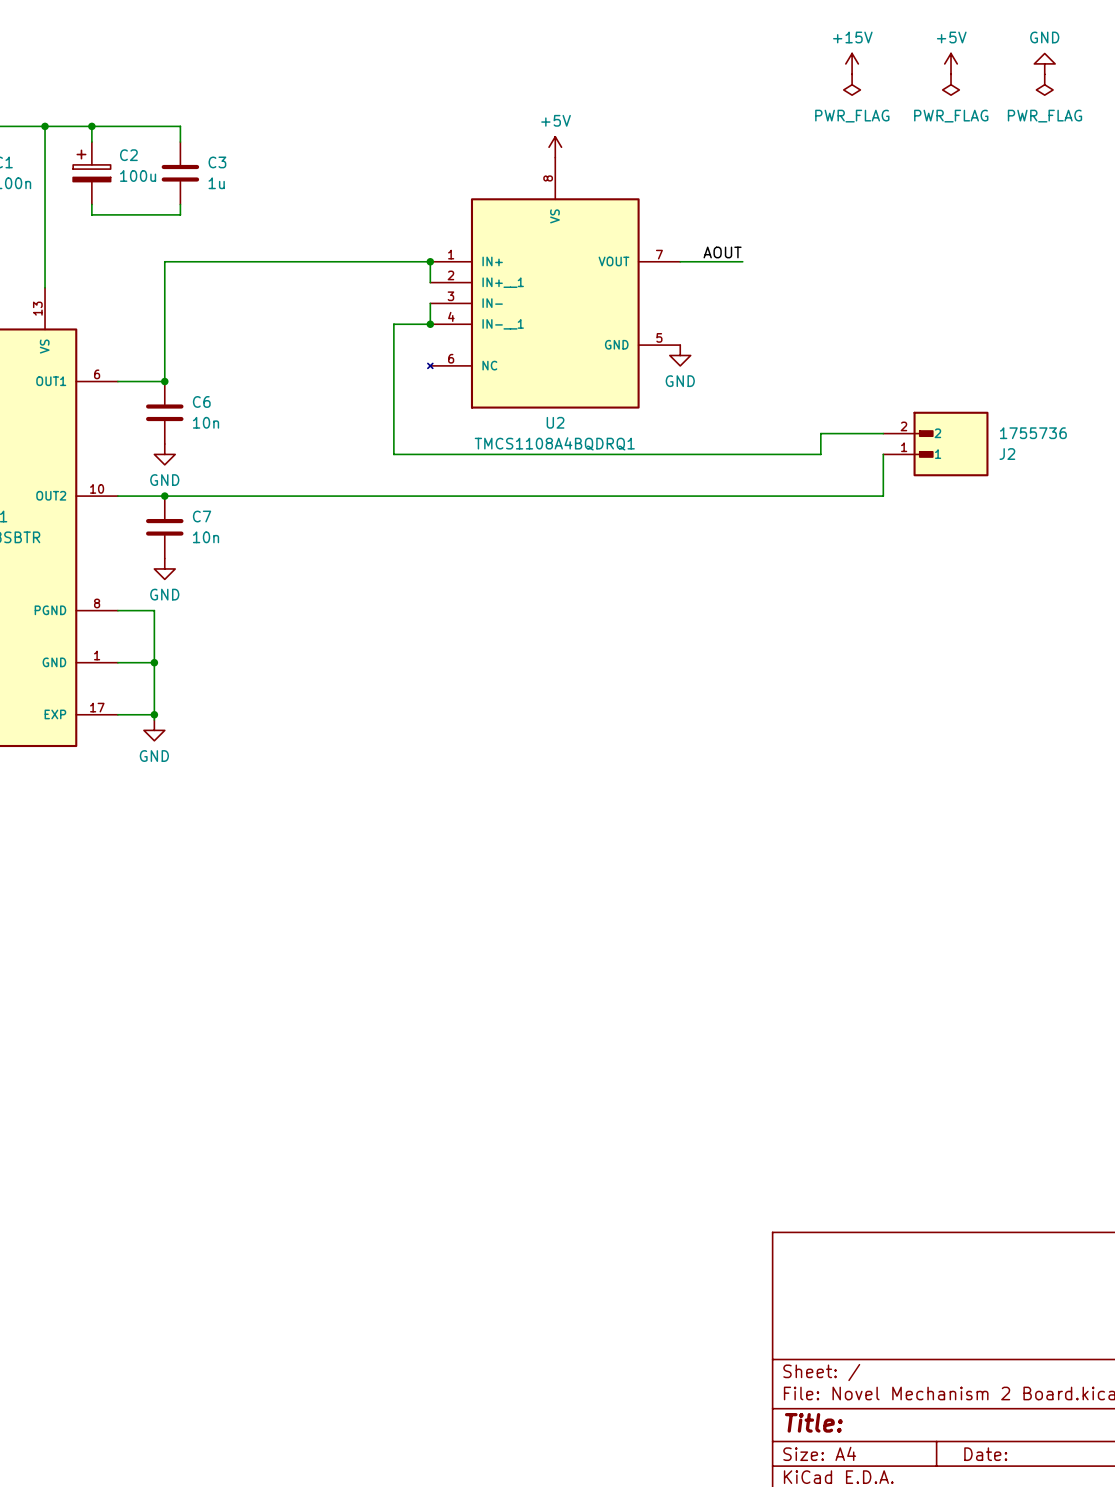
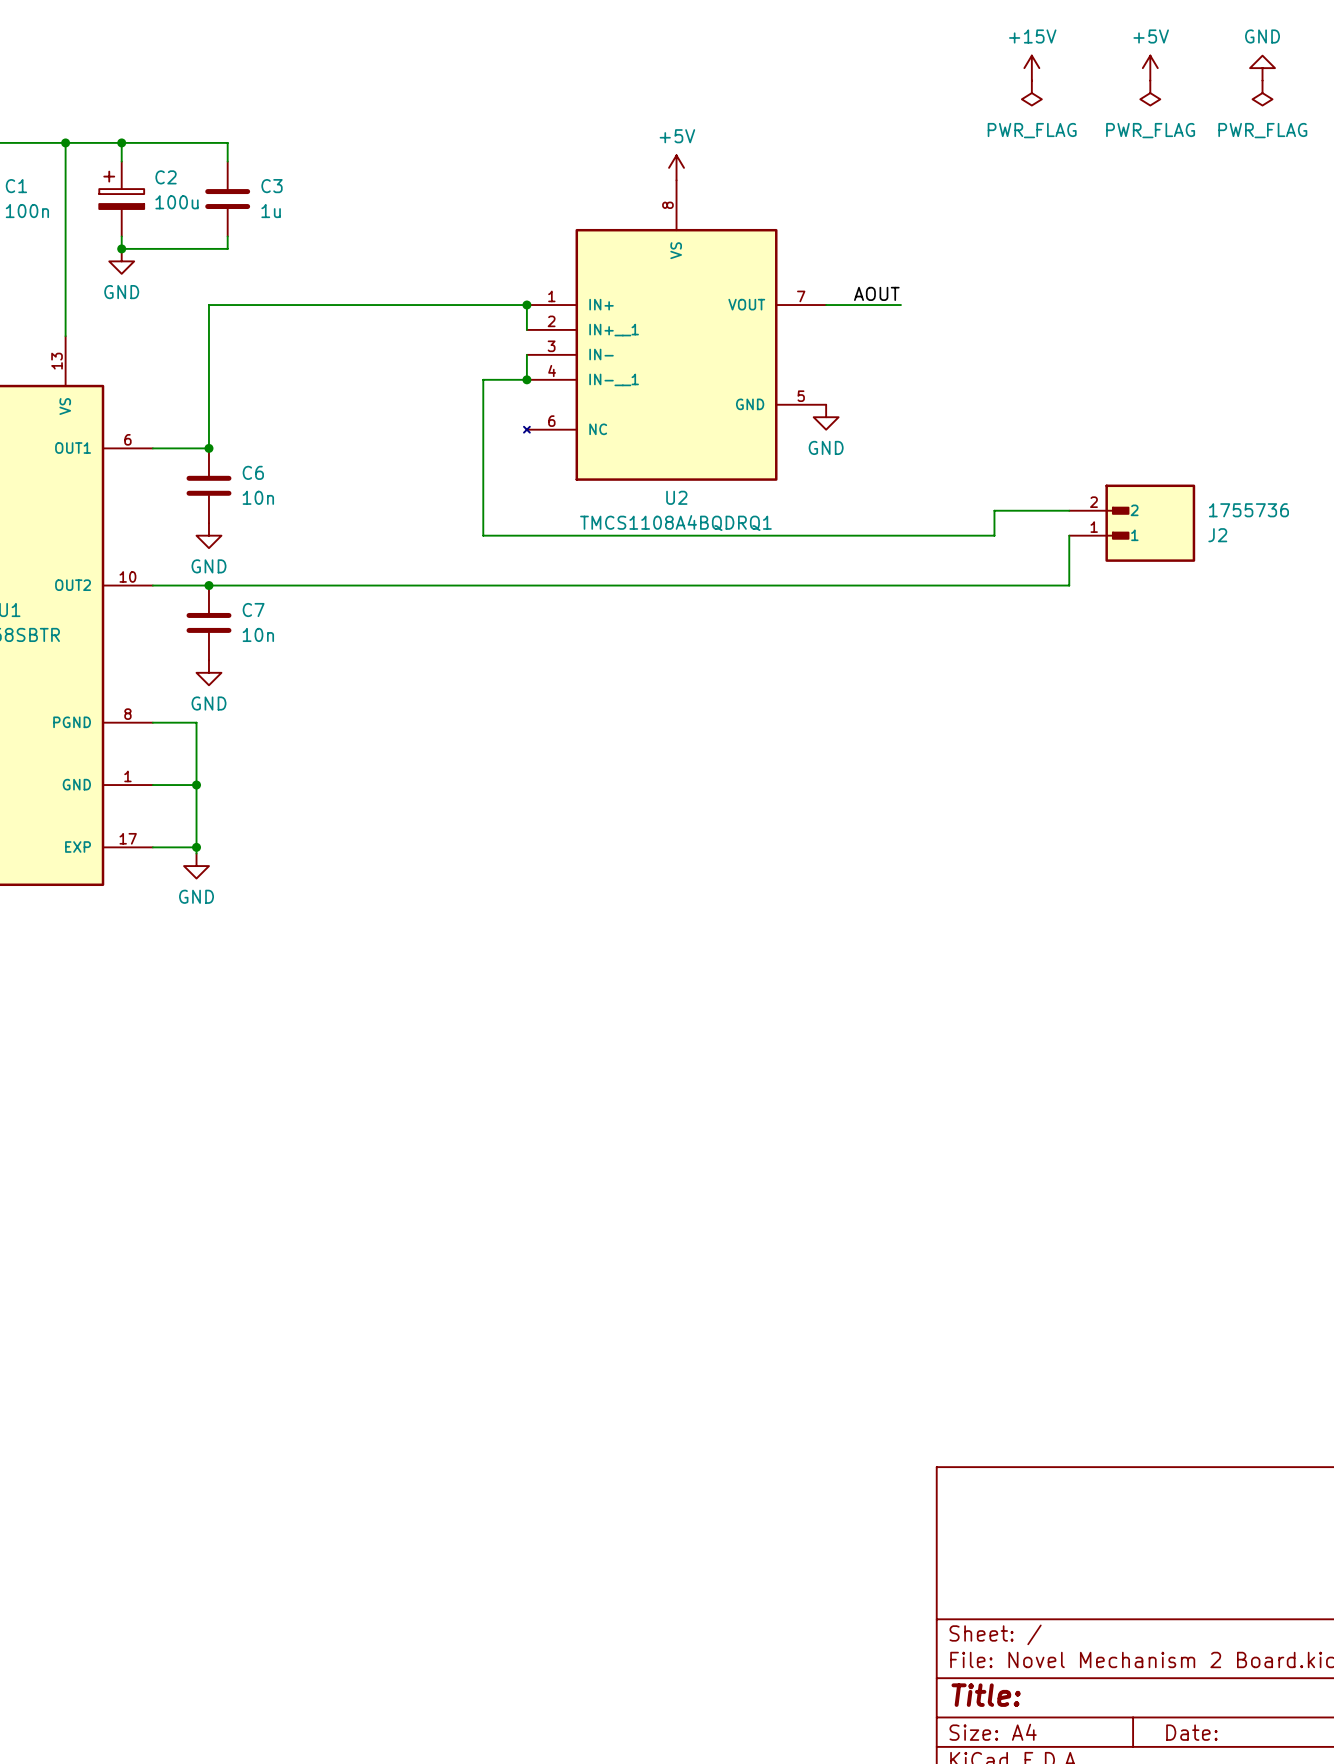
junction: none -> (121, 248)
power symbol: none -> GND (121, 261)

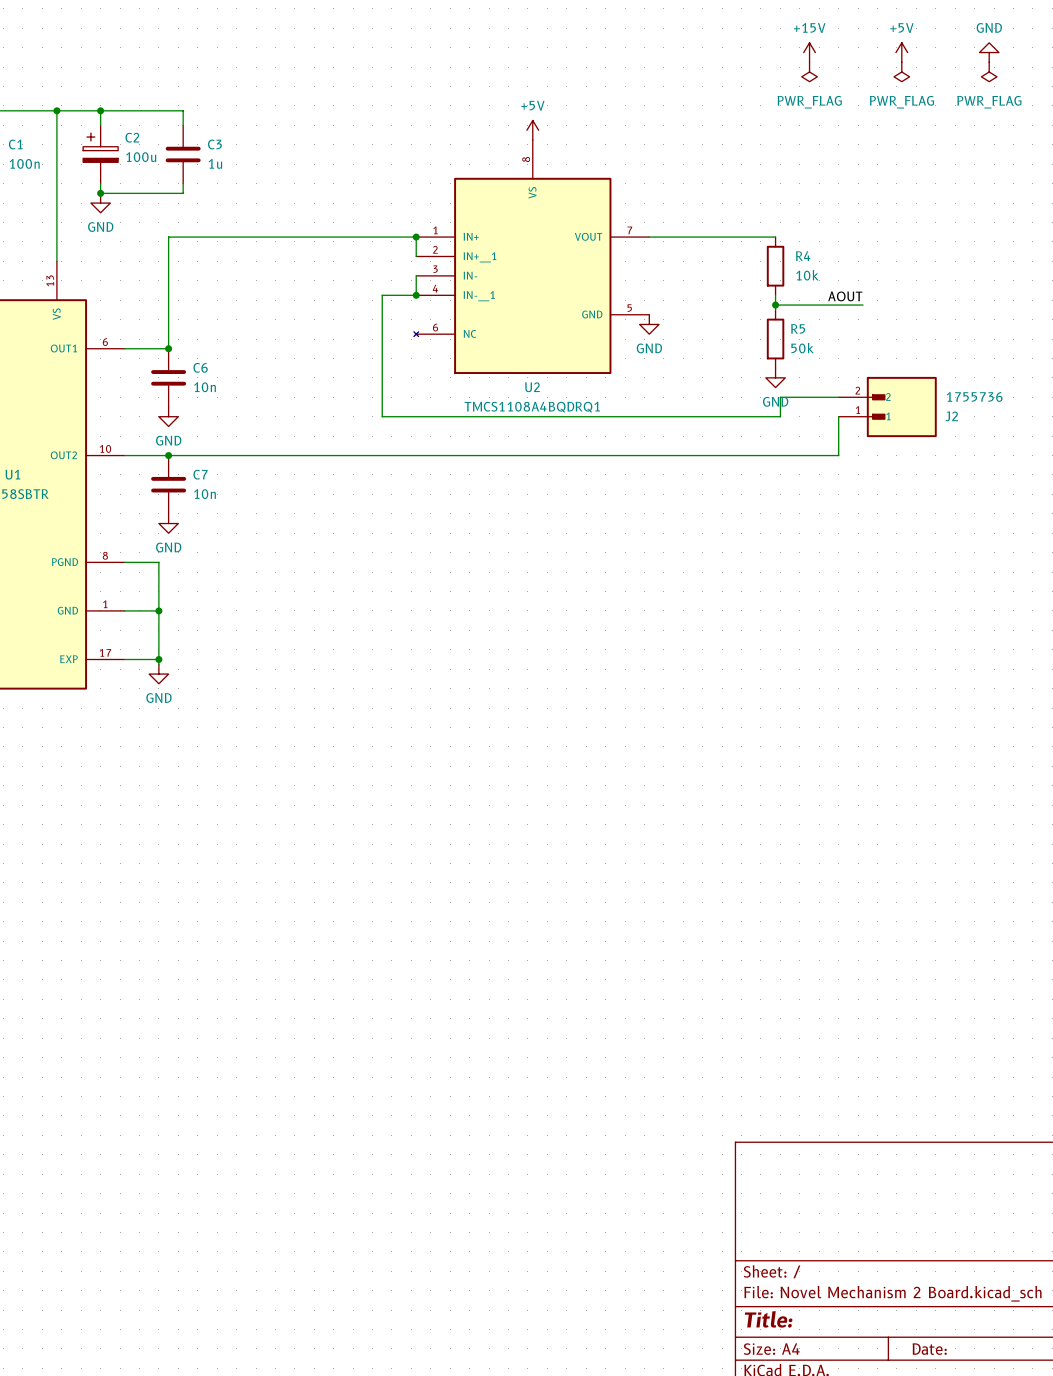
label position: AOUT (876, 293) -> AOUT (845, 296)
wire: none -> (707, 237) (775, 237)
R4: none -> 10k (775, 266)
wire: none -> (775, 295) (775, 309)
wire: none -> (775, 305) (862, 305)
junction: none -> (775, 305)
R5: none -> 50k (775, 339)
power symbol: none -> GND (775, 377)

